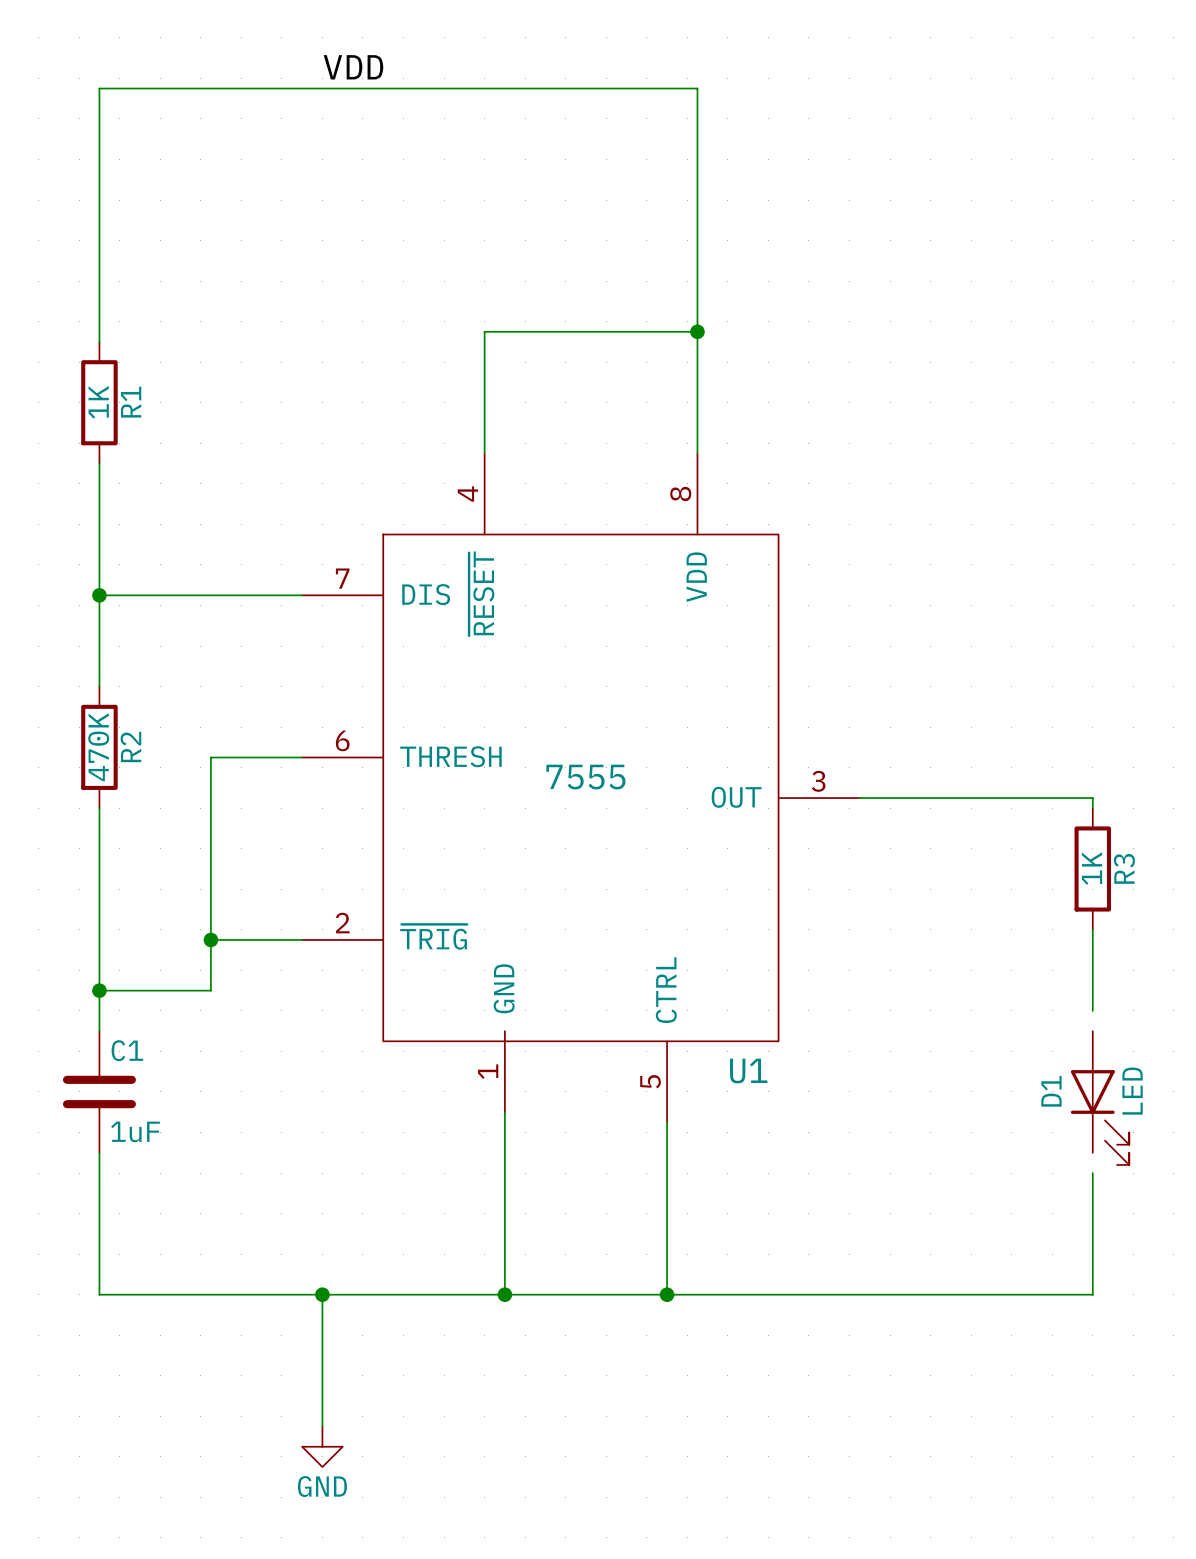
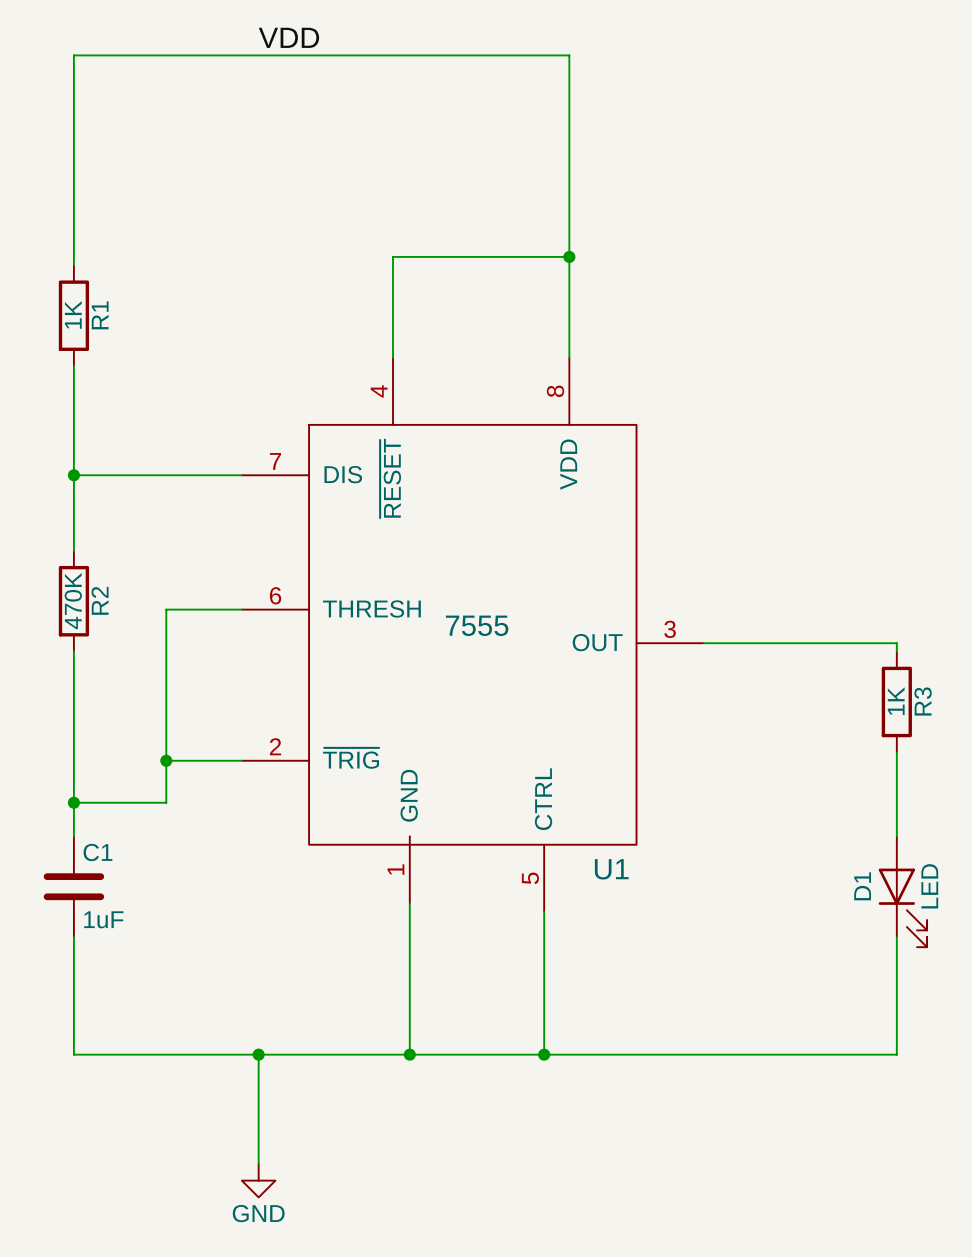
wire: none -> (896, 819) (896, 836)
wire: none -> (896, 937) (896, 953)

